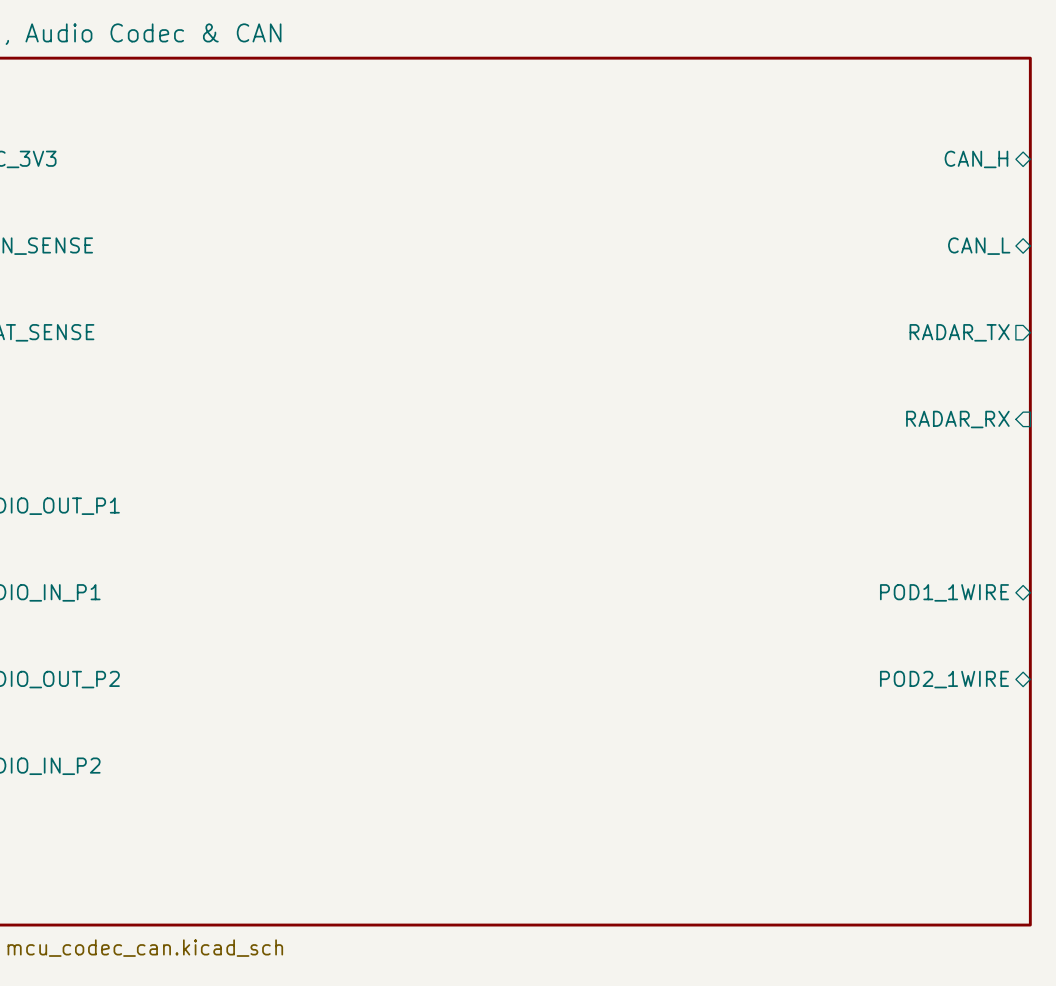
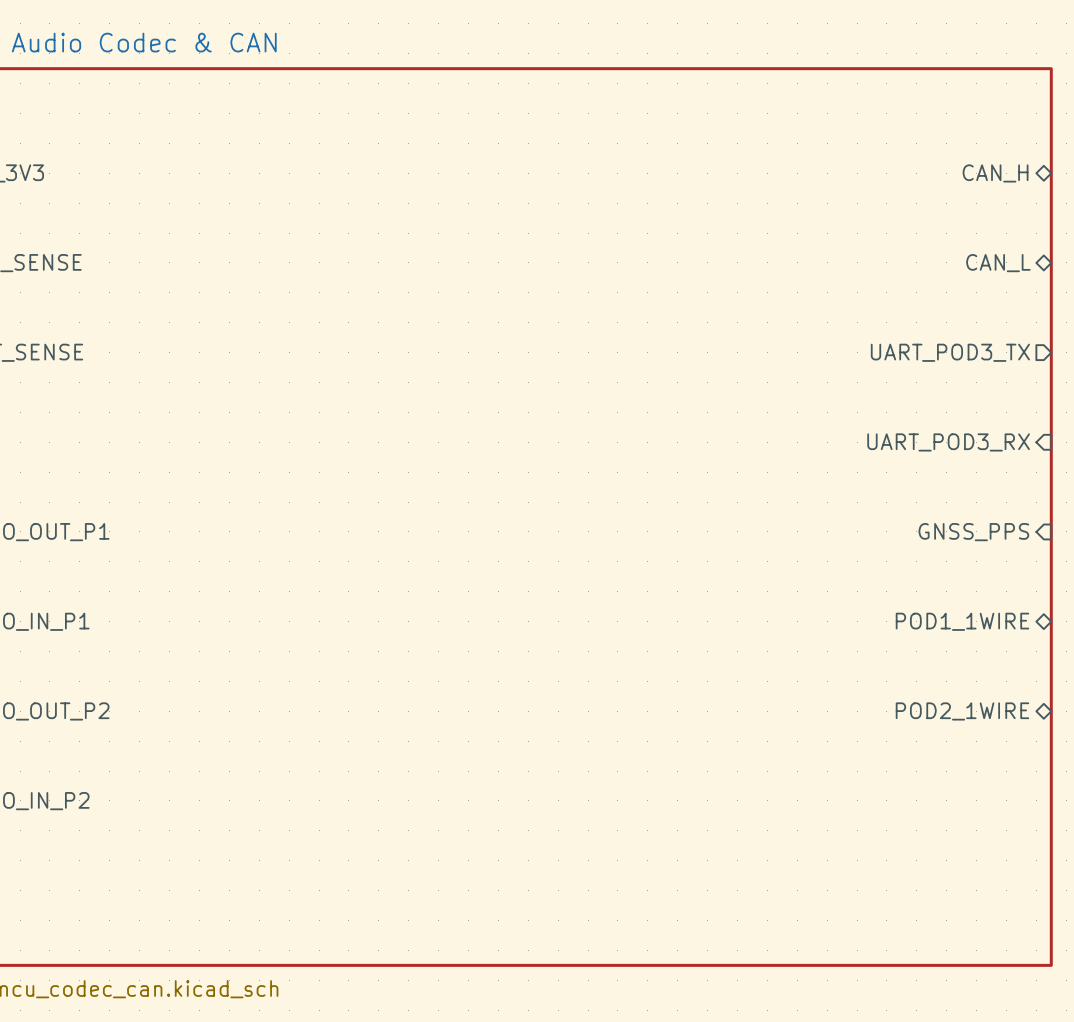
sheet pin: RADAR_TX (959, 332) -> UART_POD3_TX (950, 352)
sheet pin: RADAR_RX (957, 419) -> UART_POD3_RX (948, 442)
sheet pin: none -> GNSS_PPS (973, 532)

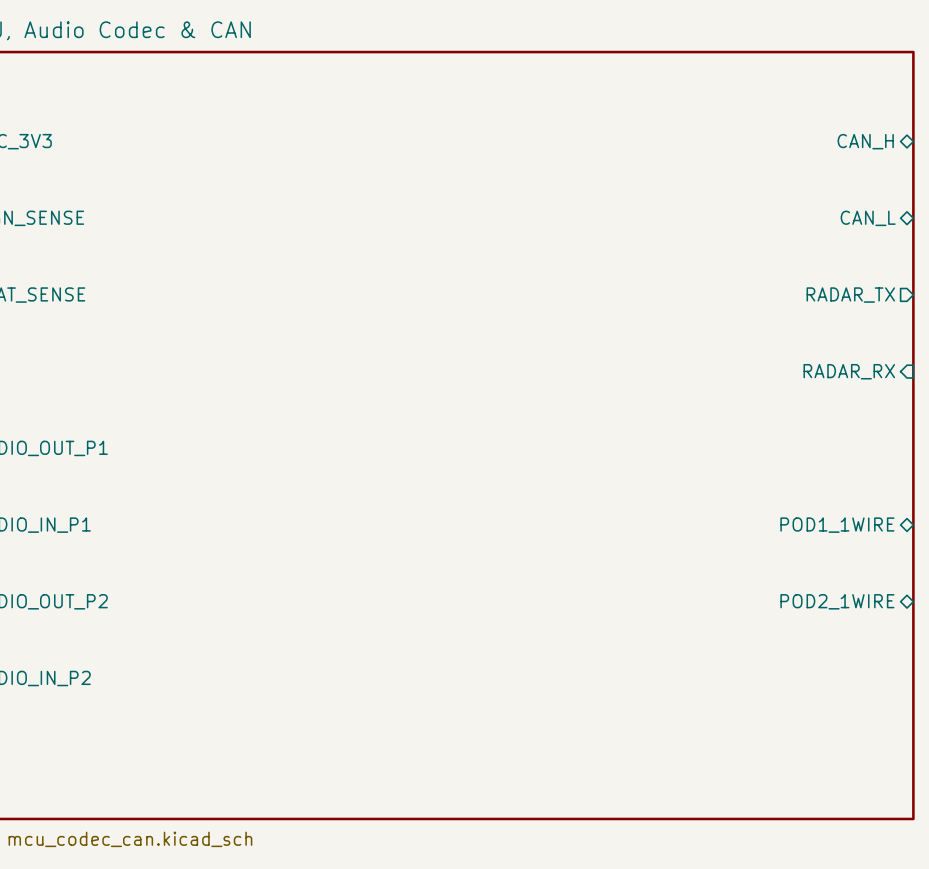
sheet pin: UART_POD3_TX (950, 352) -> RADAR_TX (850, 295)
sheet pin: UART_POD3_RX (948, 442) -> RADAR_RX (849, 371)
sheet pin: GNSS_PPS (973, 532) -> none

